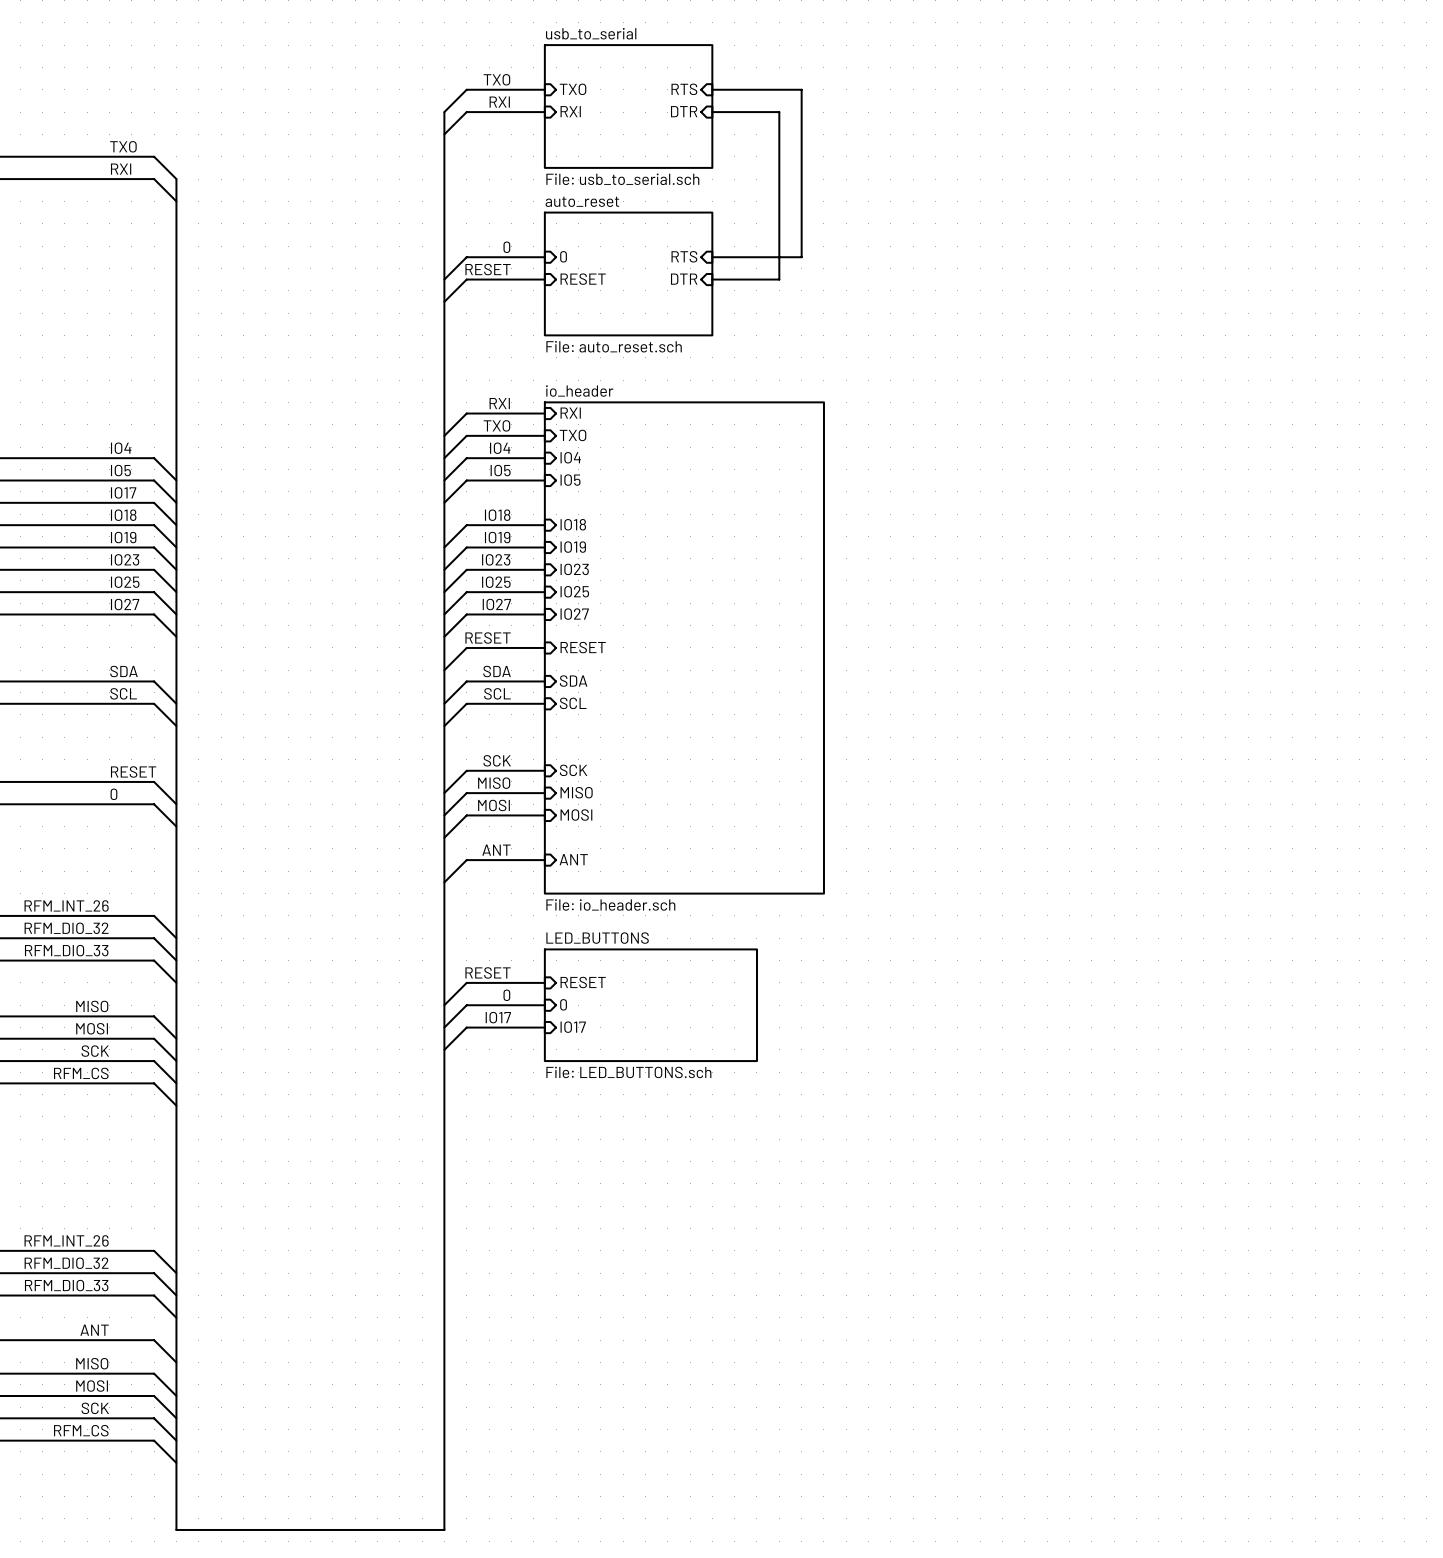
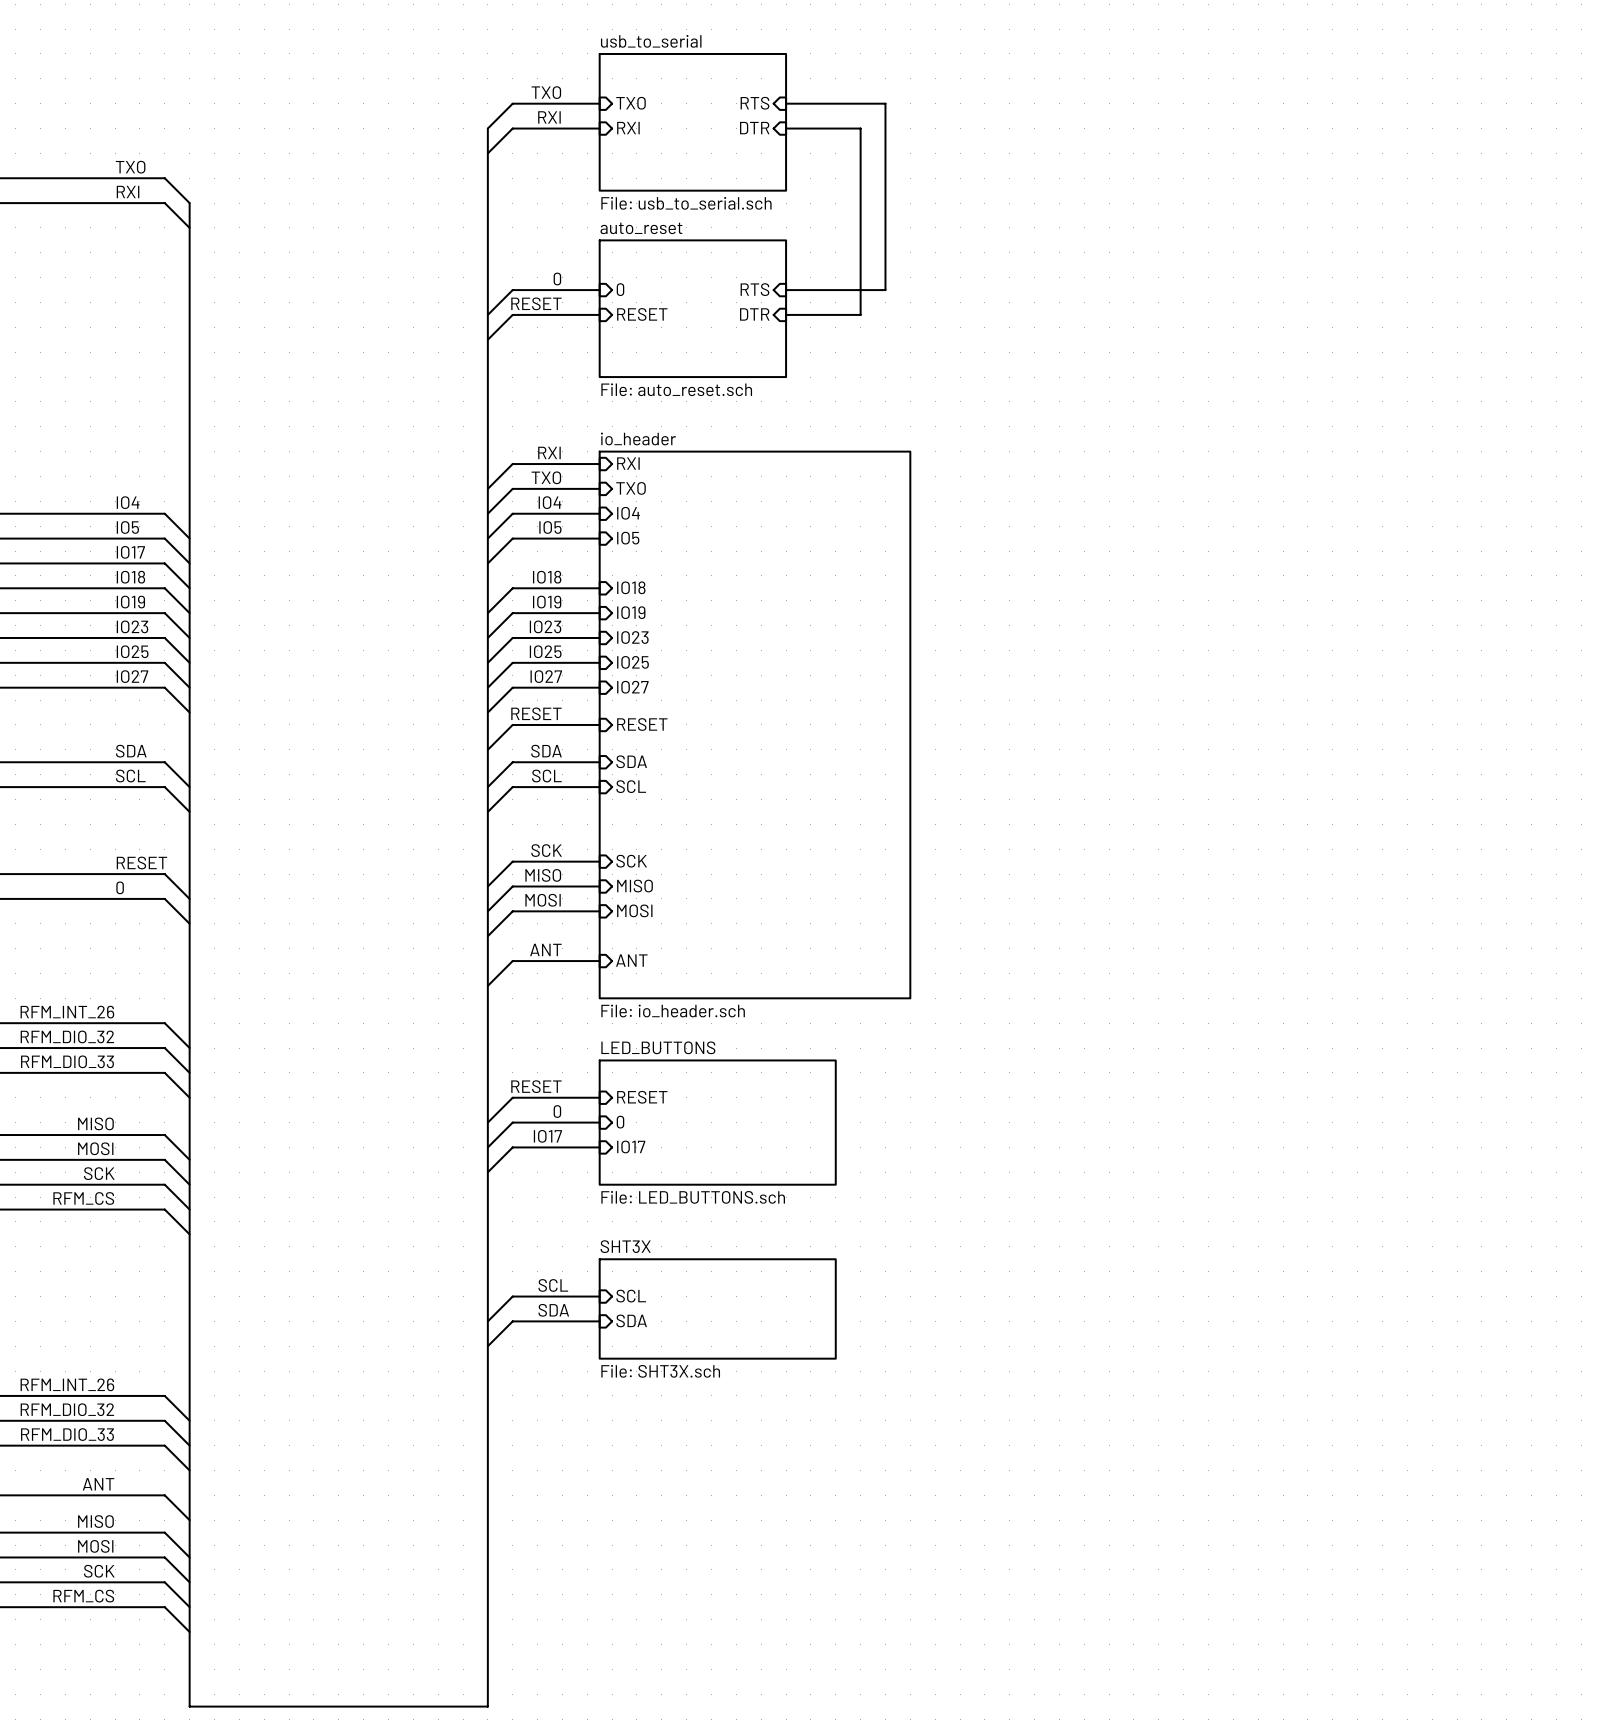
label: none -> SCL (553, 1285)
wire: none -> (599, 1296) (512, 1296) (487, 1321)
sheet pin: none -> SCL (631, 1296)
sheet SHT3X: none -> File: SHT3X.sch (717, 1308)
label: none -> SDA (553, 1310)
wire: none -> (599, 1321) (512, 1321) (487, 1346)
sheet pin: none -> SDA (631, 1320)

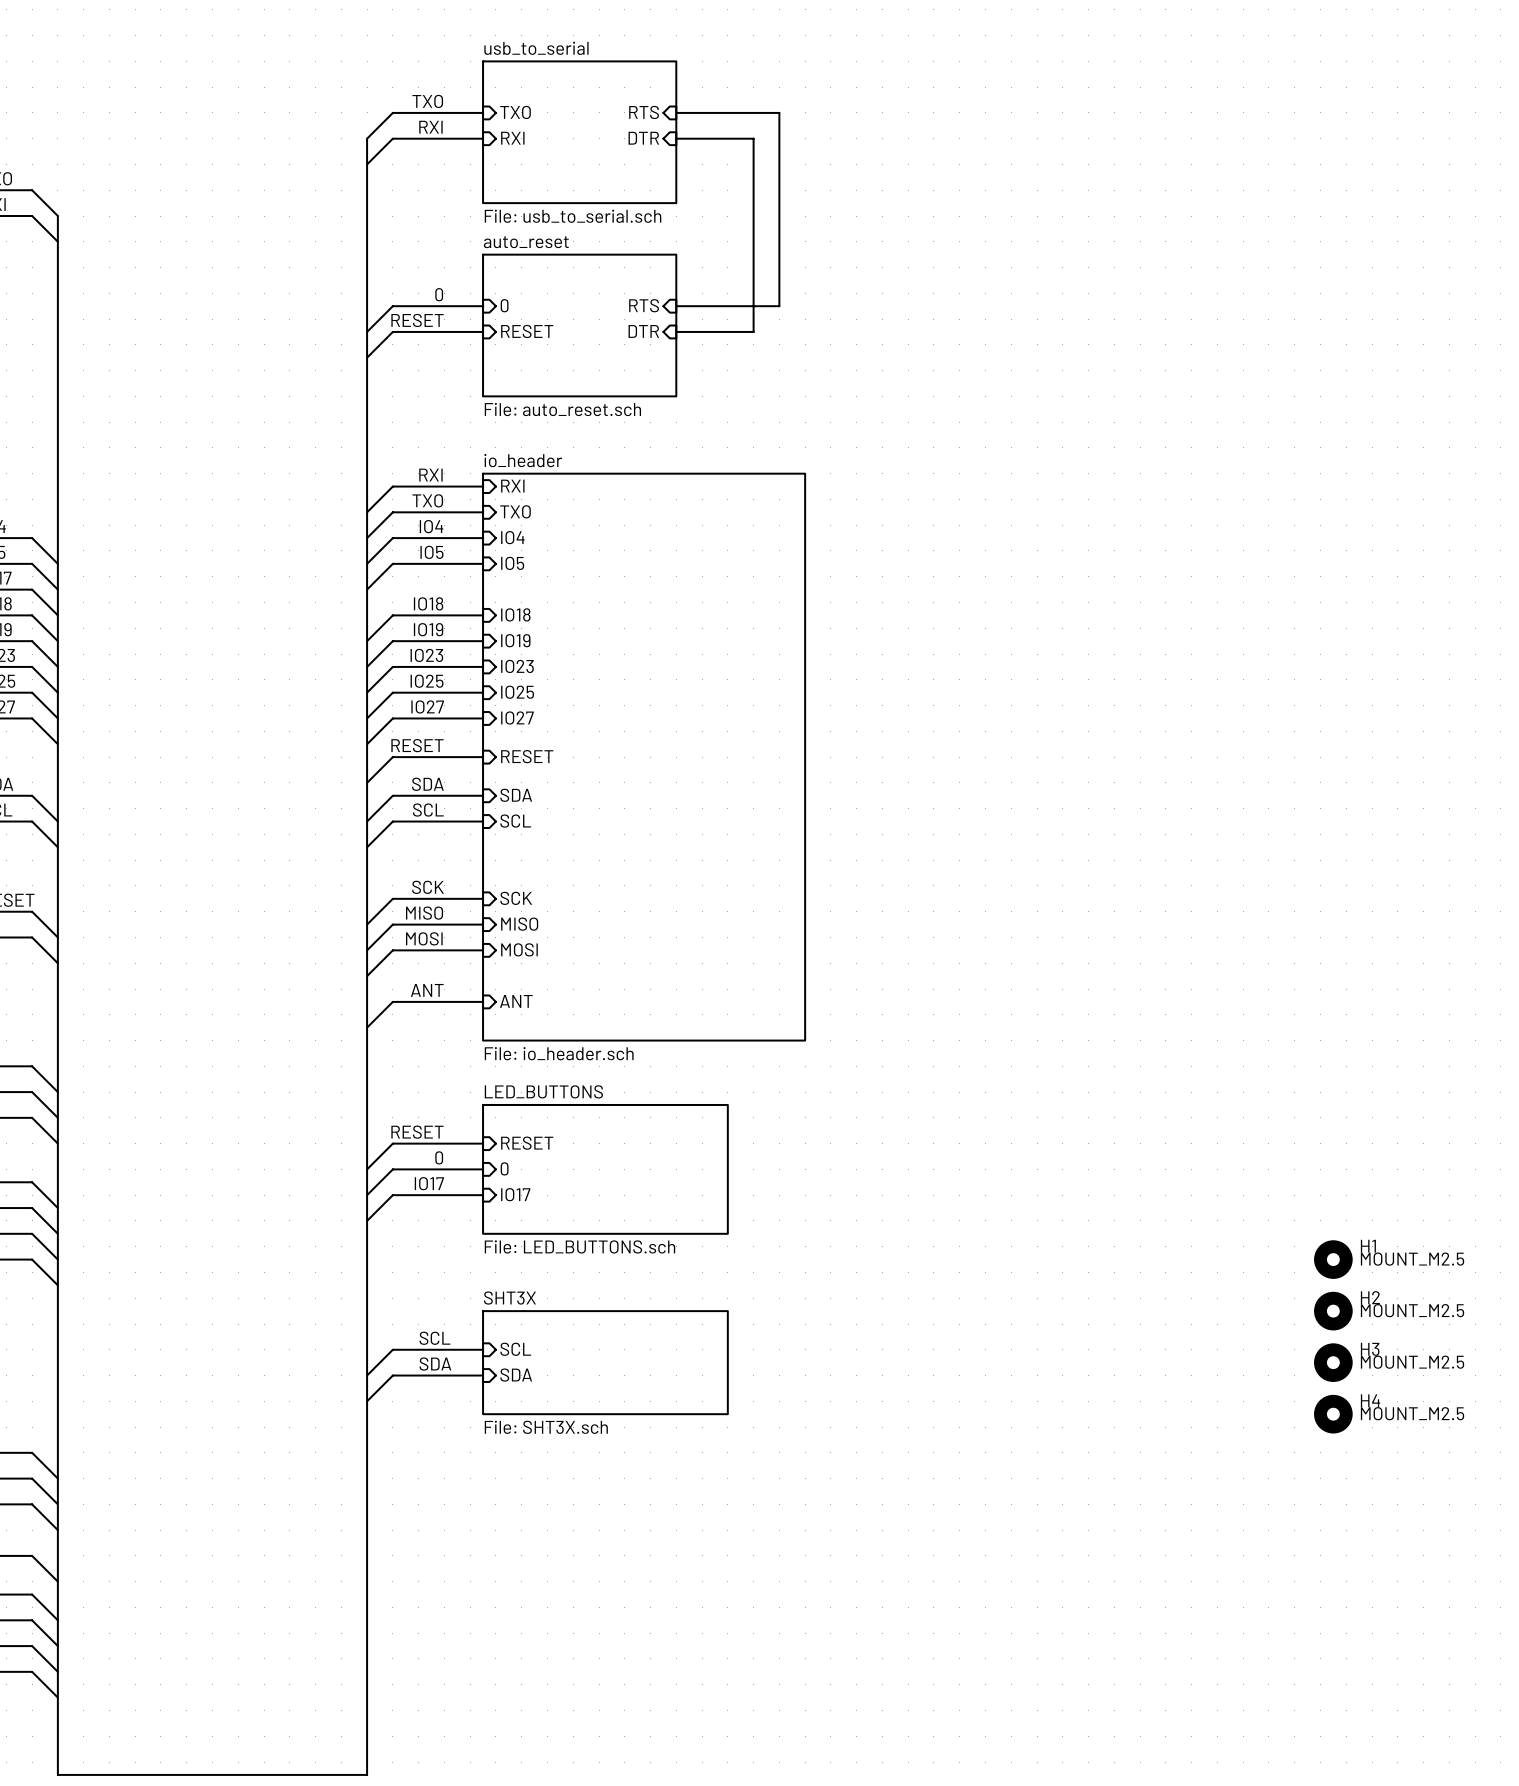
H1: none -> MOUNT_M2.5 (1333, 1259)
H2: none -> MOUNT_M2.5 (1333, 1311)
H3: none -> MOUNT_M2.5 (1333, 1362)
H4: none -> MOUNT_M2.5 (1333, 1414)

